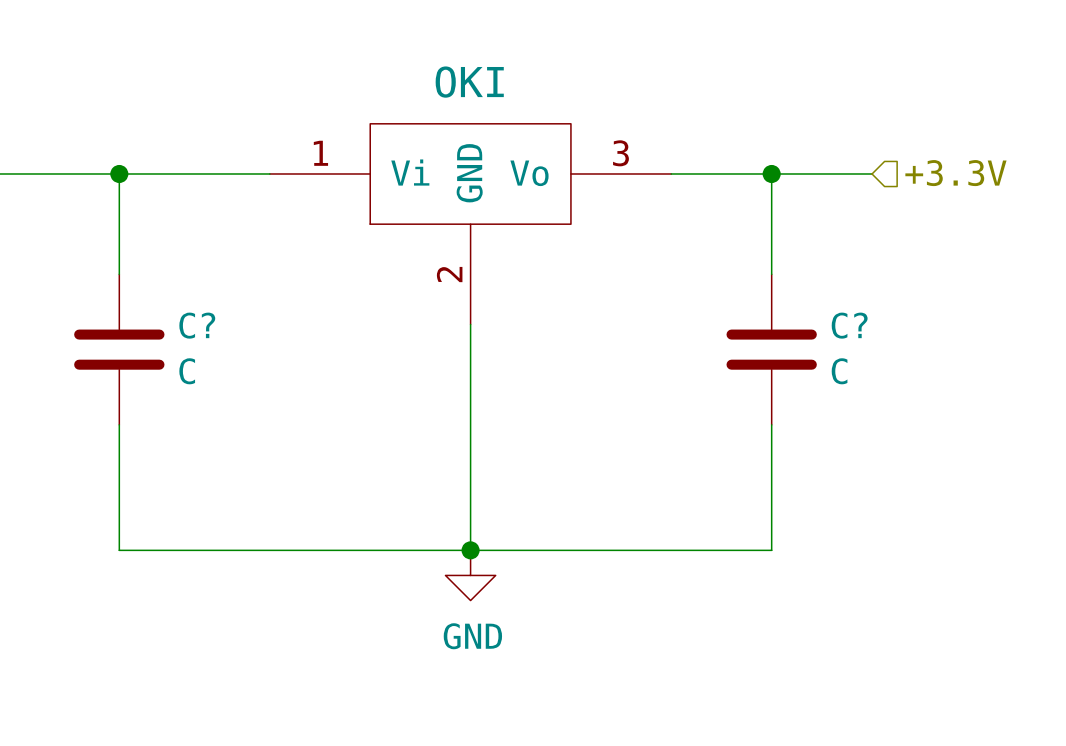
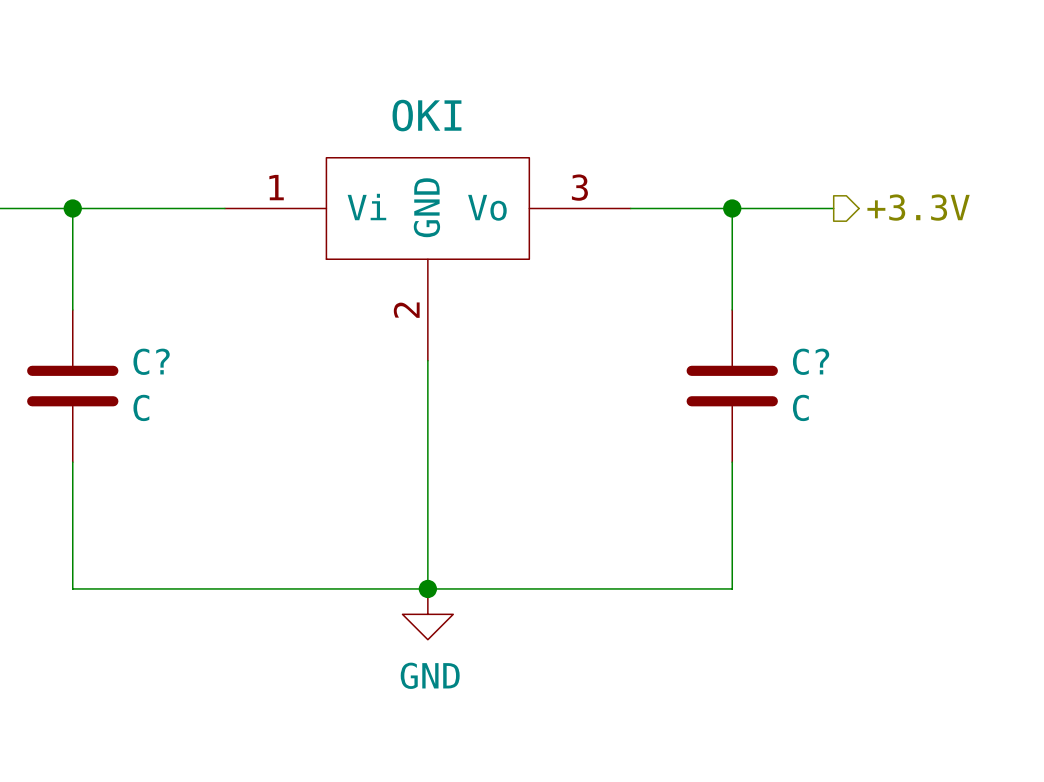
hierarchical label shape: input (955, 173) -> output (918, 207)

